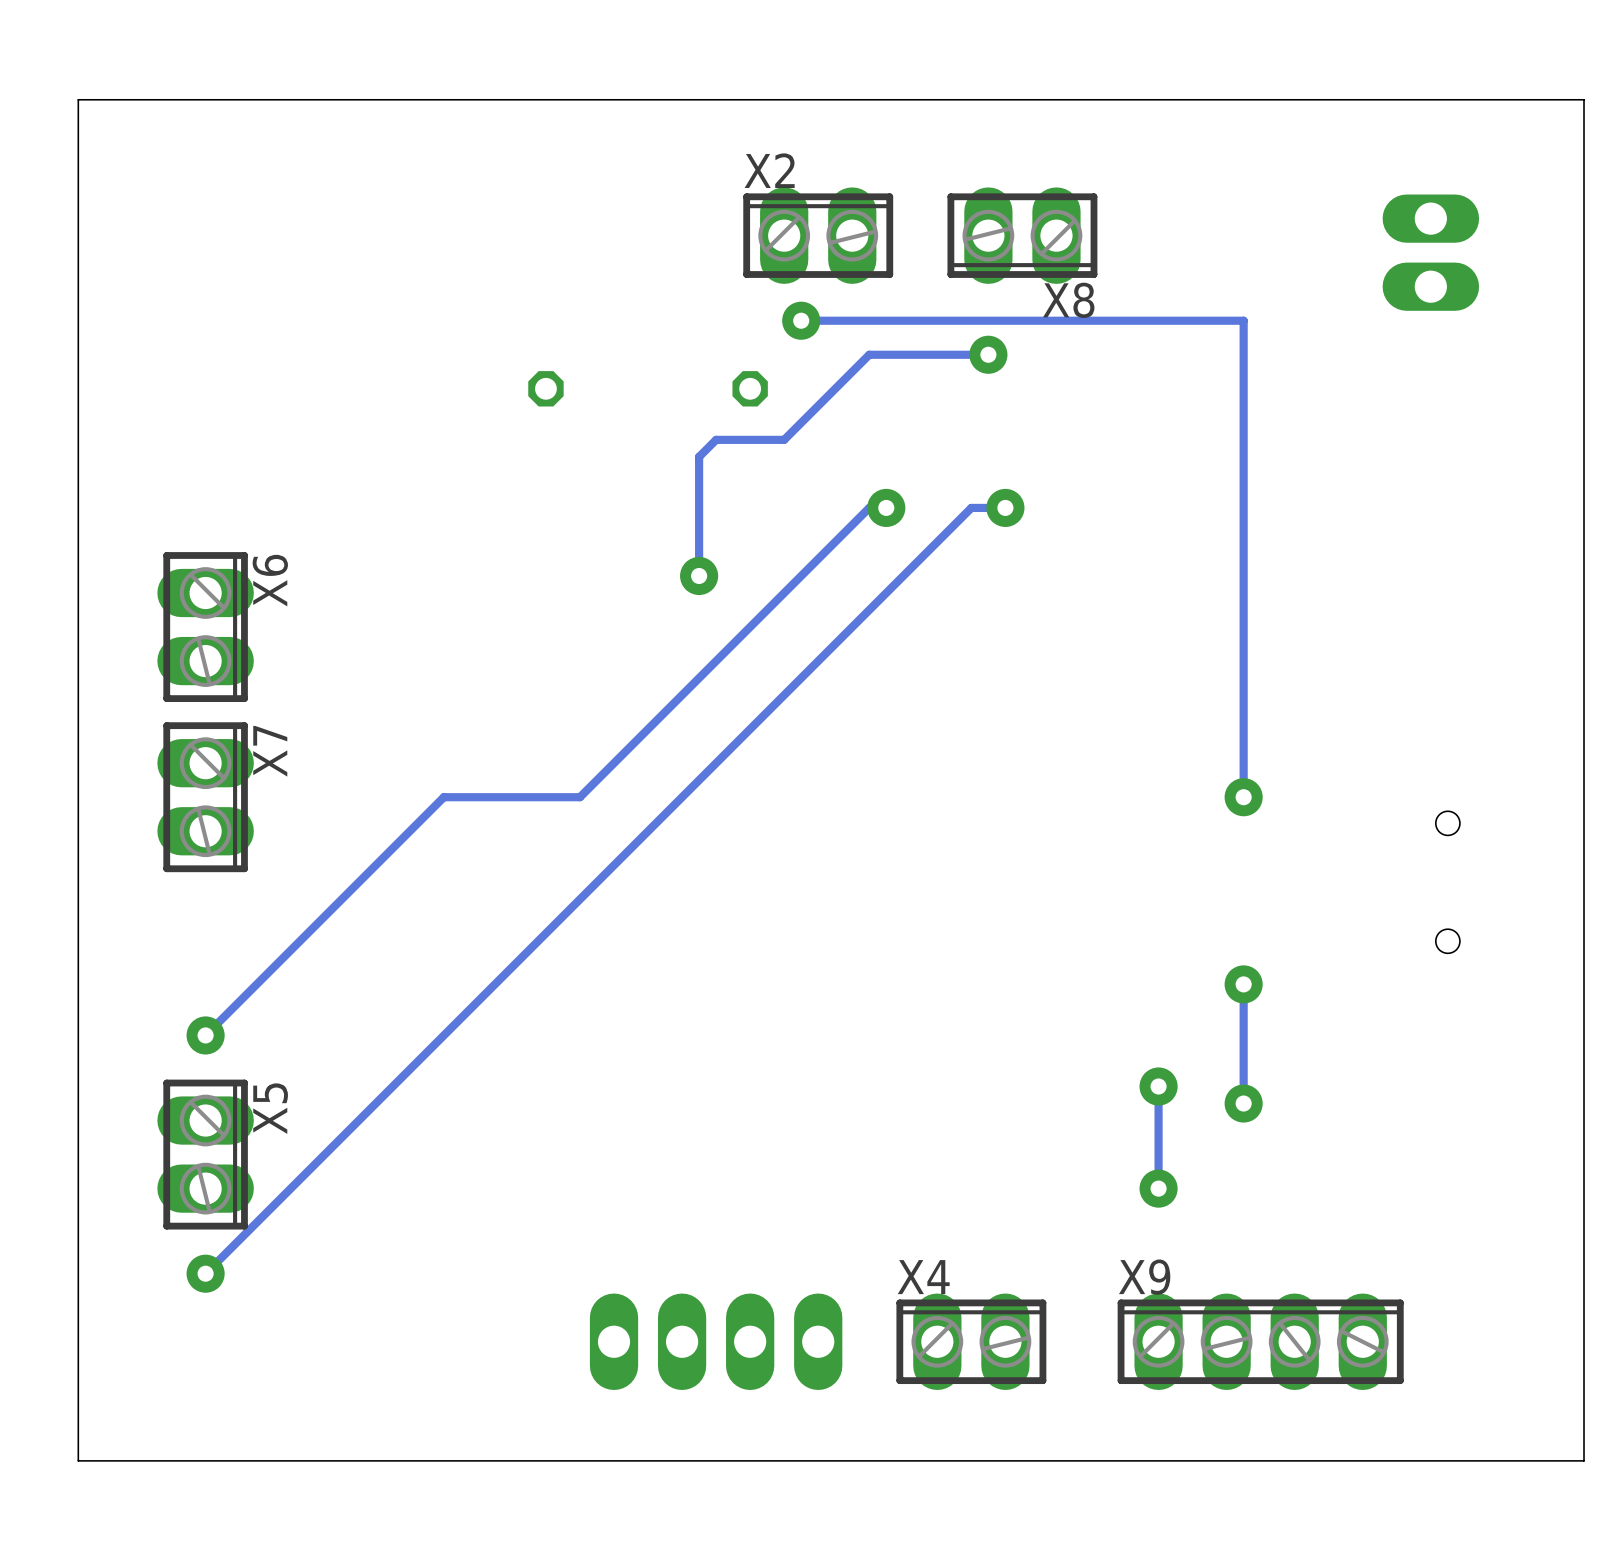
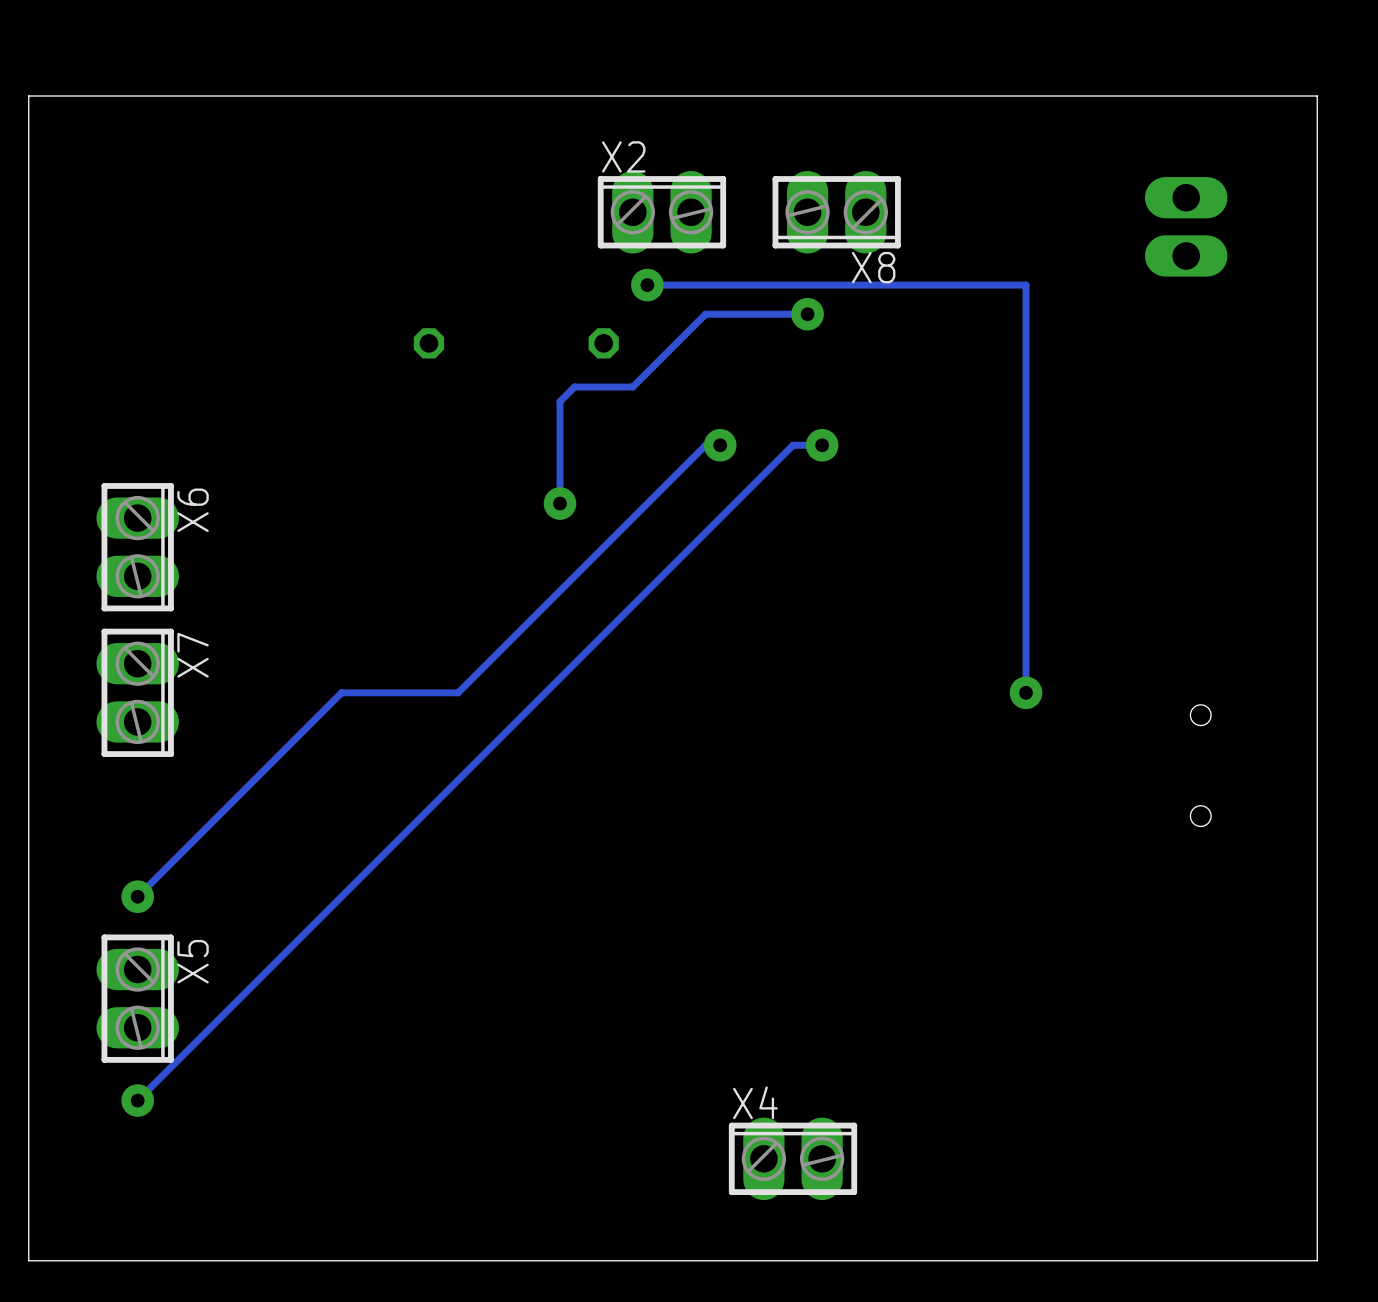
track: (1243, 984) (1243, 1103) -> none
via: (1243, 984) -> none
track: (1158, 1086) (1158, 1188) -> none
via: (1158, 1086) -> none
via: (1243, 1103) -> none
via: (1158, 1188) -> none
part: (716, 1341) -> none
X9: (1260, 1341) -> none

